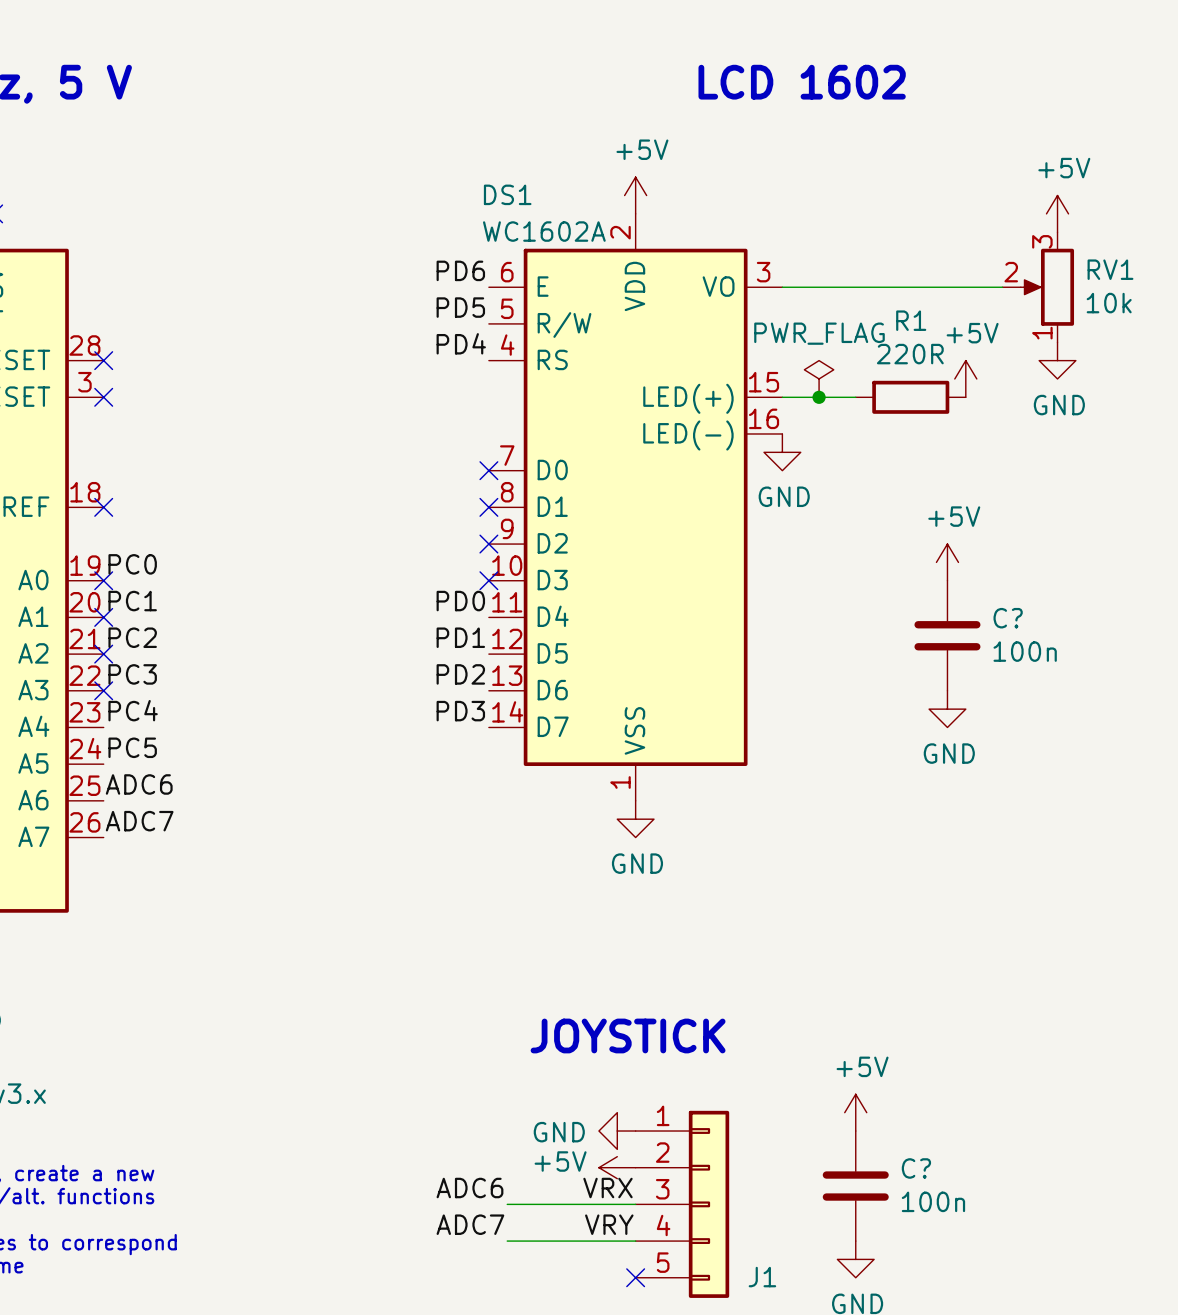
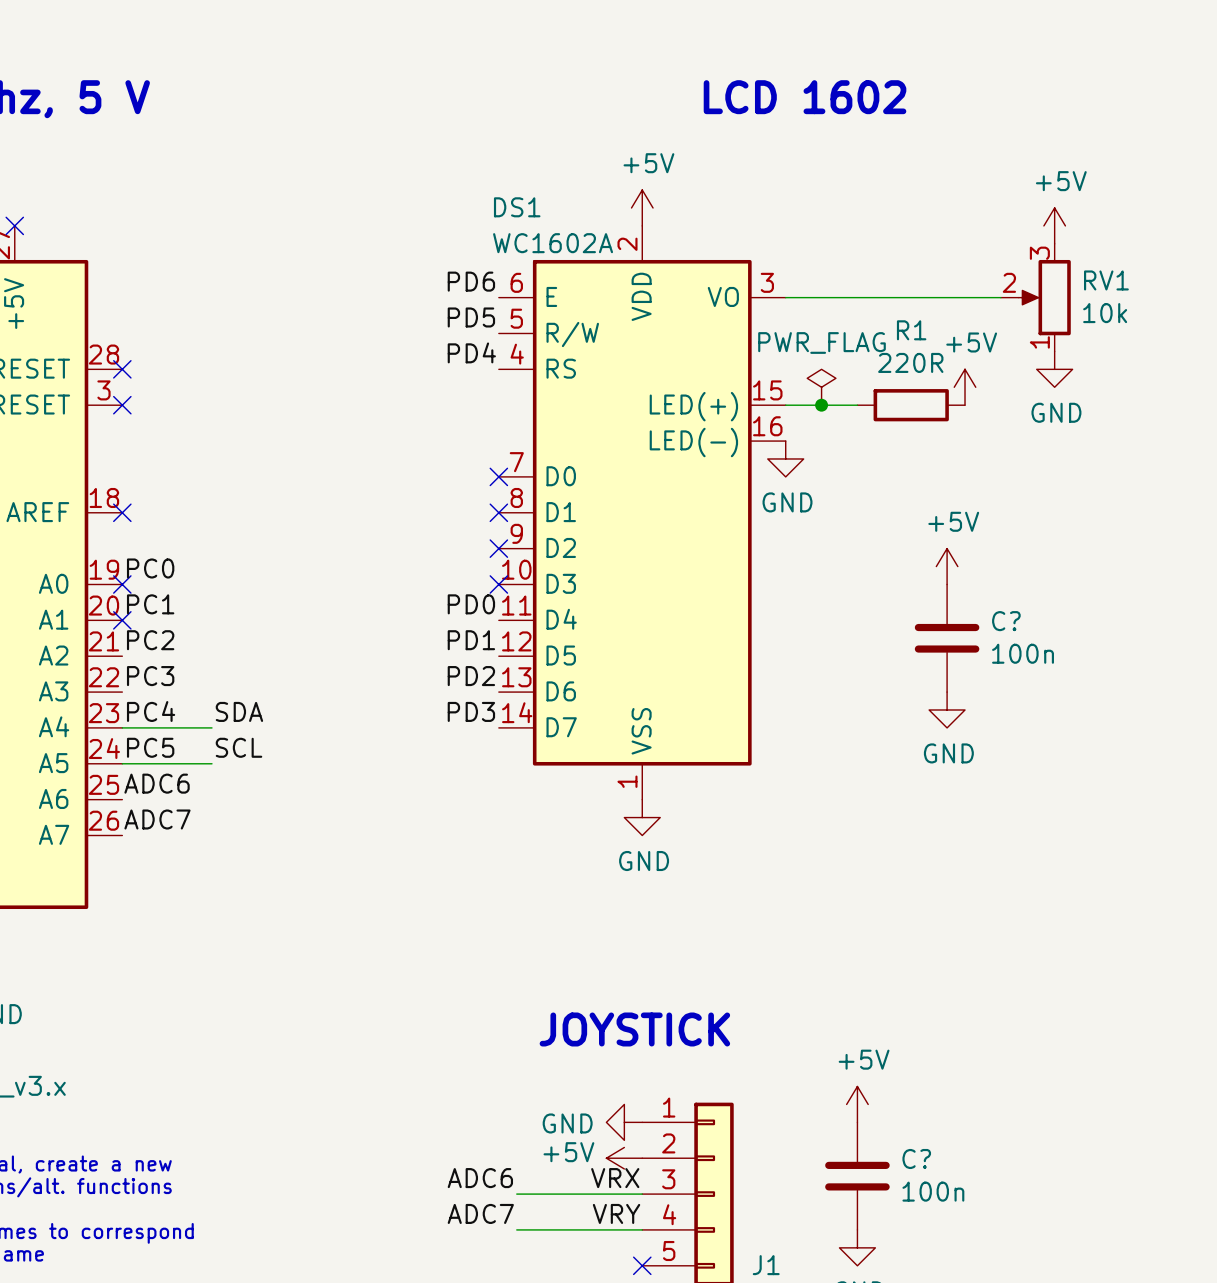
no-connect mark: (103, 654) -> none
no-connect mark: (103, 690) -> none
label: none -> SDA (239, 711)
wire: none -> (122, 727) (211, 727)
label: none -> SCL (239, 747)
wire: none -> (122, 763) (211, 763)

